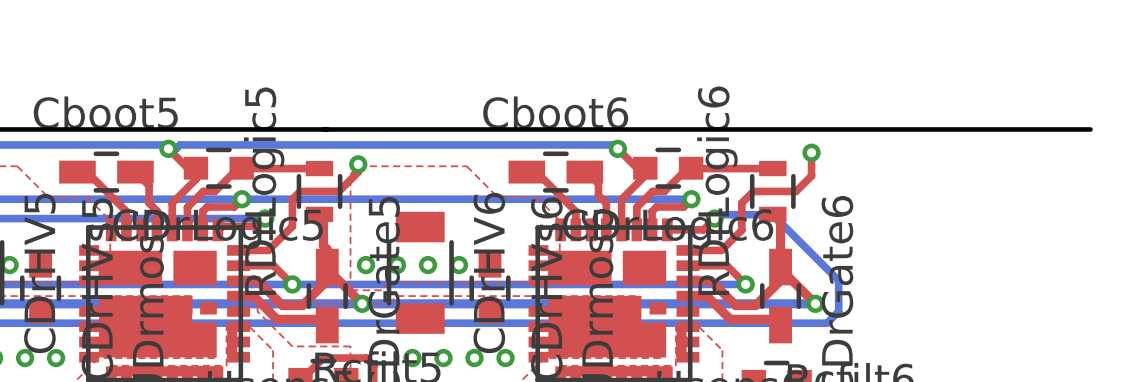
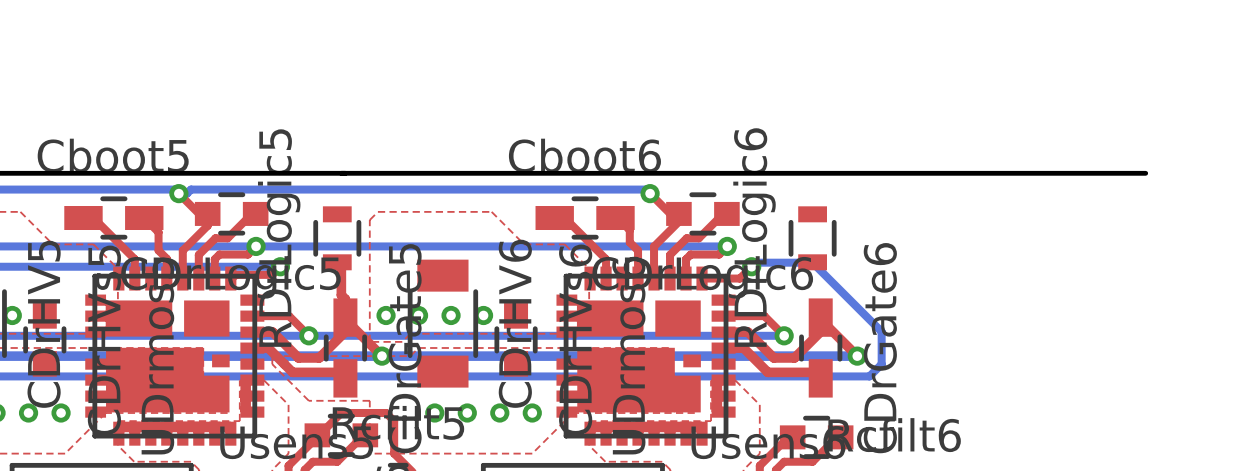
top track: (811, 152) (811, 175) (796, 191) (753, 191) (741, 203) (741, 230) (721, 250) (687, 250) -> none
via: (811, 152) -> none
top track: (358, 164) (358, 172) (338, 191) (300, 191) (292, 199) (292, 226) (268, 250) (238, 250) -> none
via: (358, 164) -> none
top track: (242, 168) (319, 168) -> none
top track: (691, 168) (772, 168) -> none
top track: (772, 214) (780, 222) (780, 267) -> none

